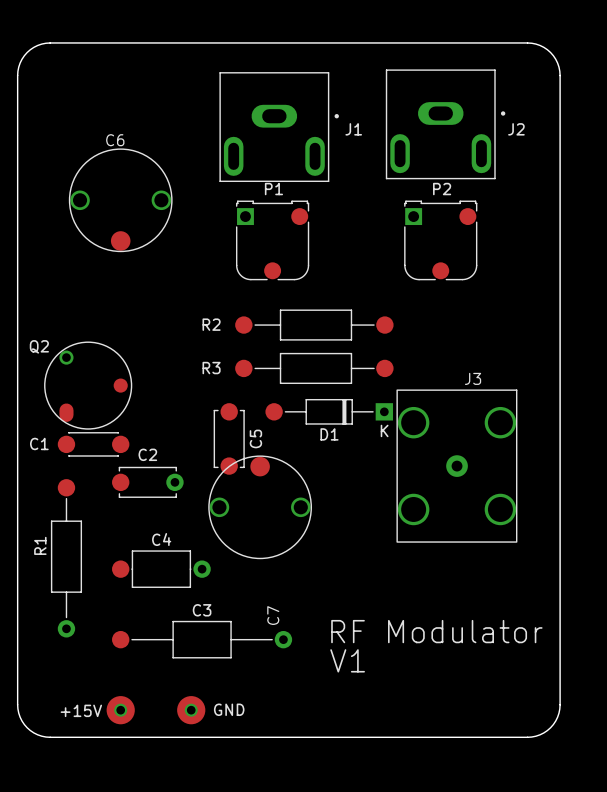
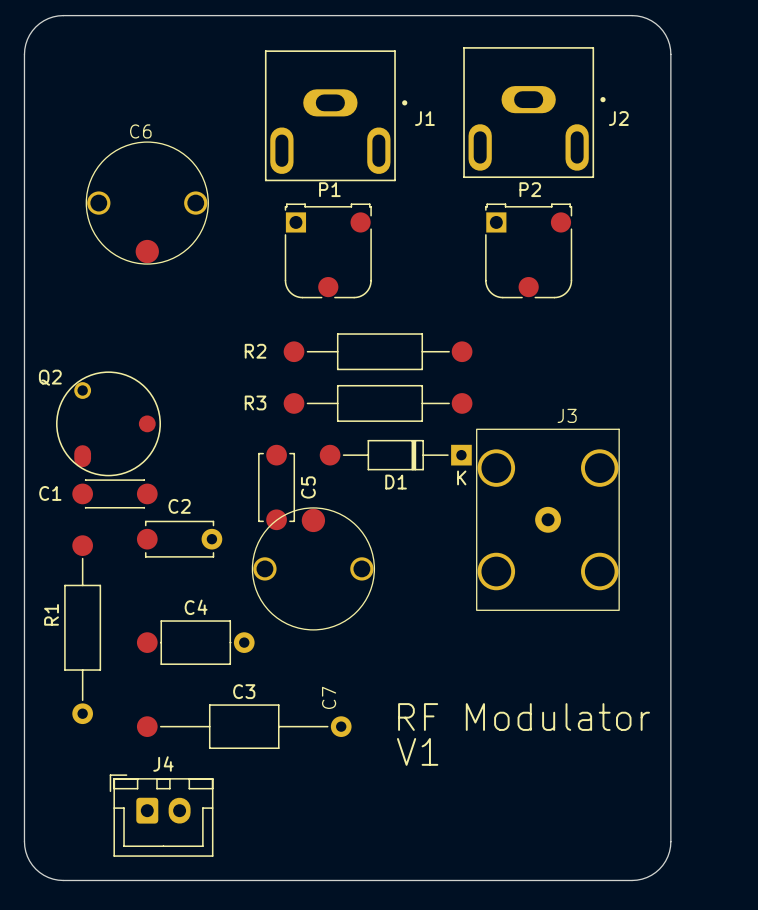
board edge: (17, 704) (20, 717) (27, 727) (37, 734) (50, 737) (527, 737) (540, 734) (550, 727) (557, 717) (560, 704) -> (24, 804) (24, 846) (29, 861) (43, 875) (63, 880) (637, 880) (655, 872) (667, 856) (670, 841) (670, 804)
+15V: (120, 710) -> none
GND: (191, 710) -> none
J4: none -> (161, 815)

